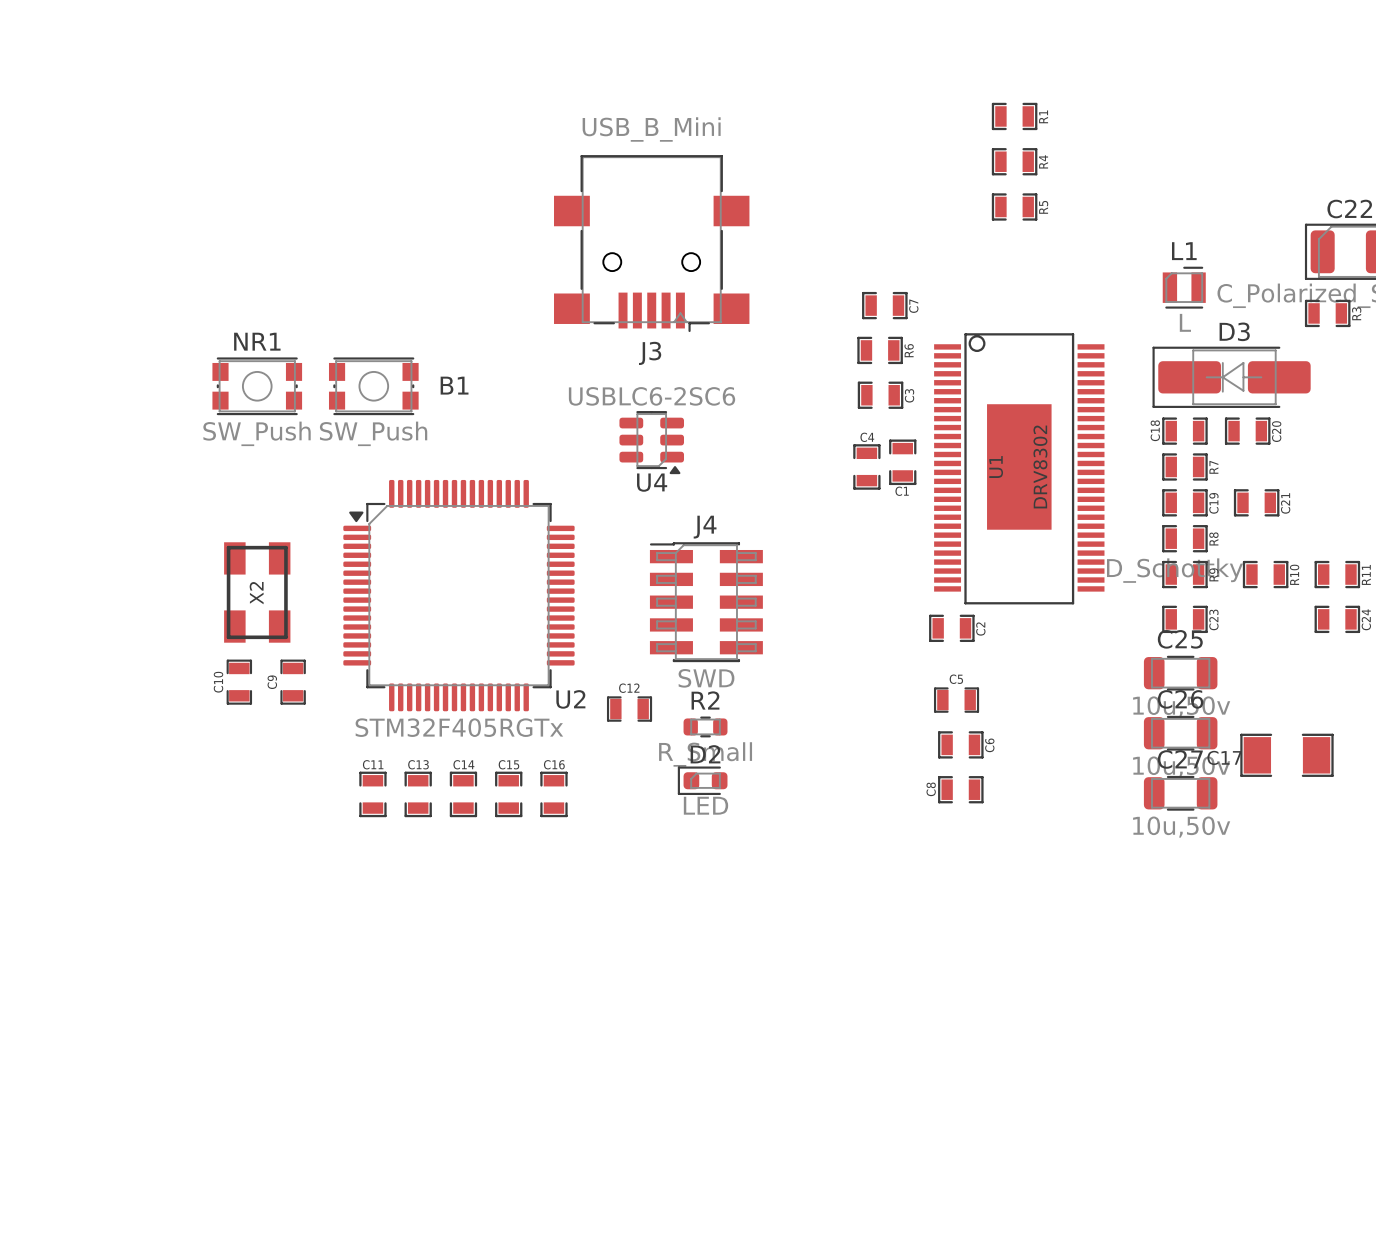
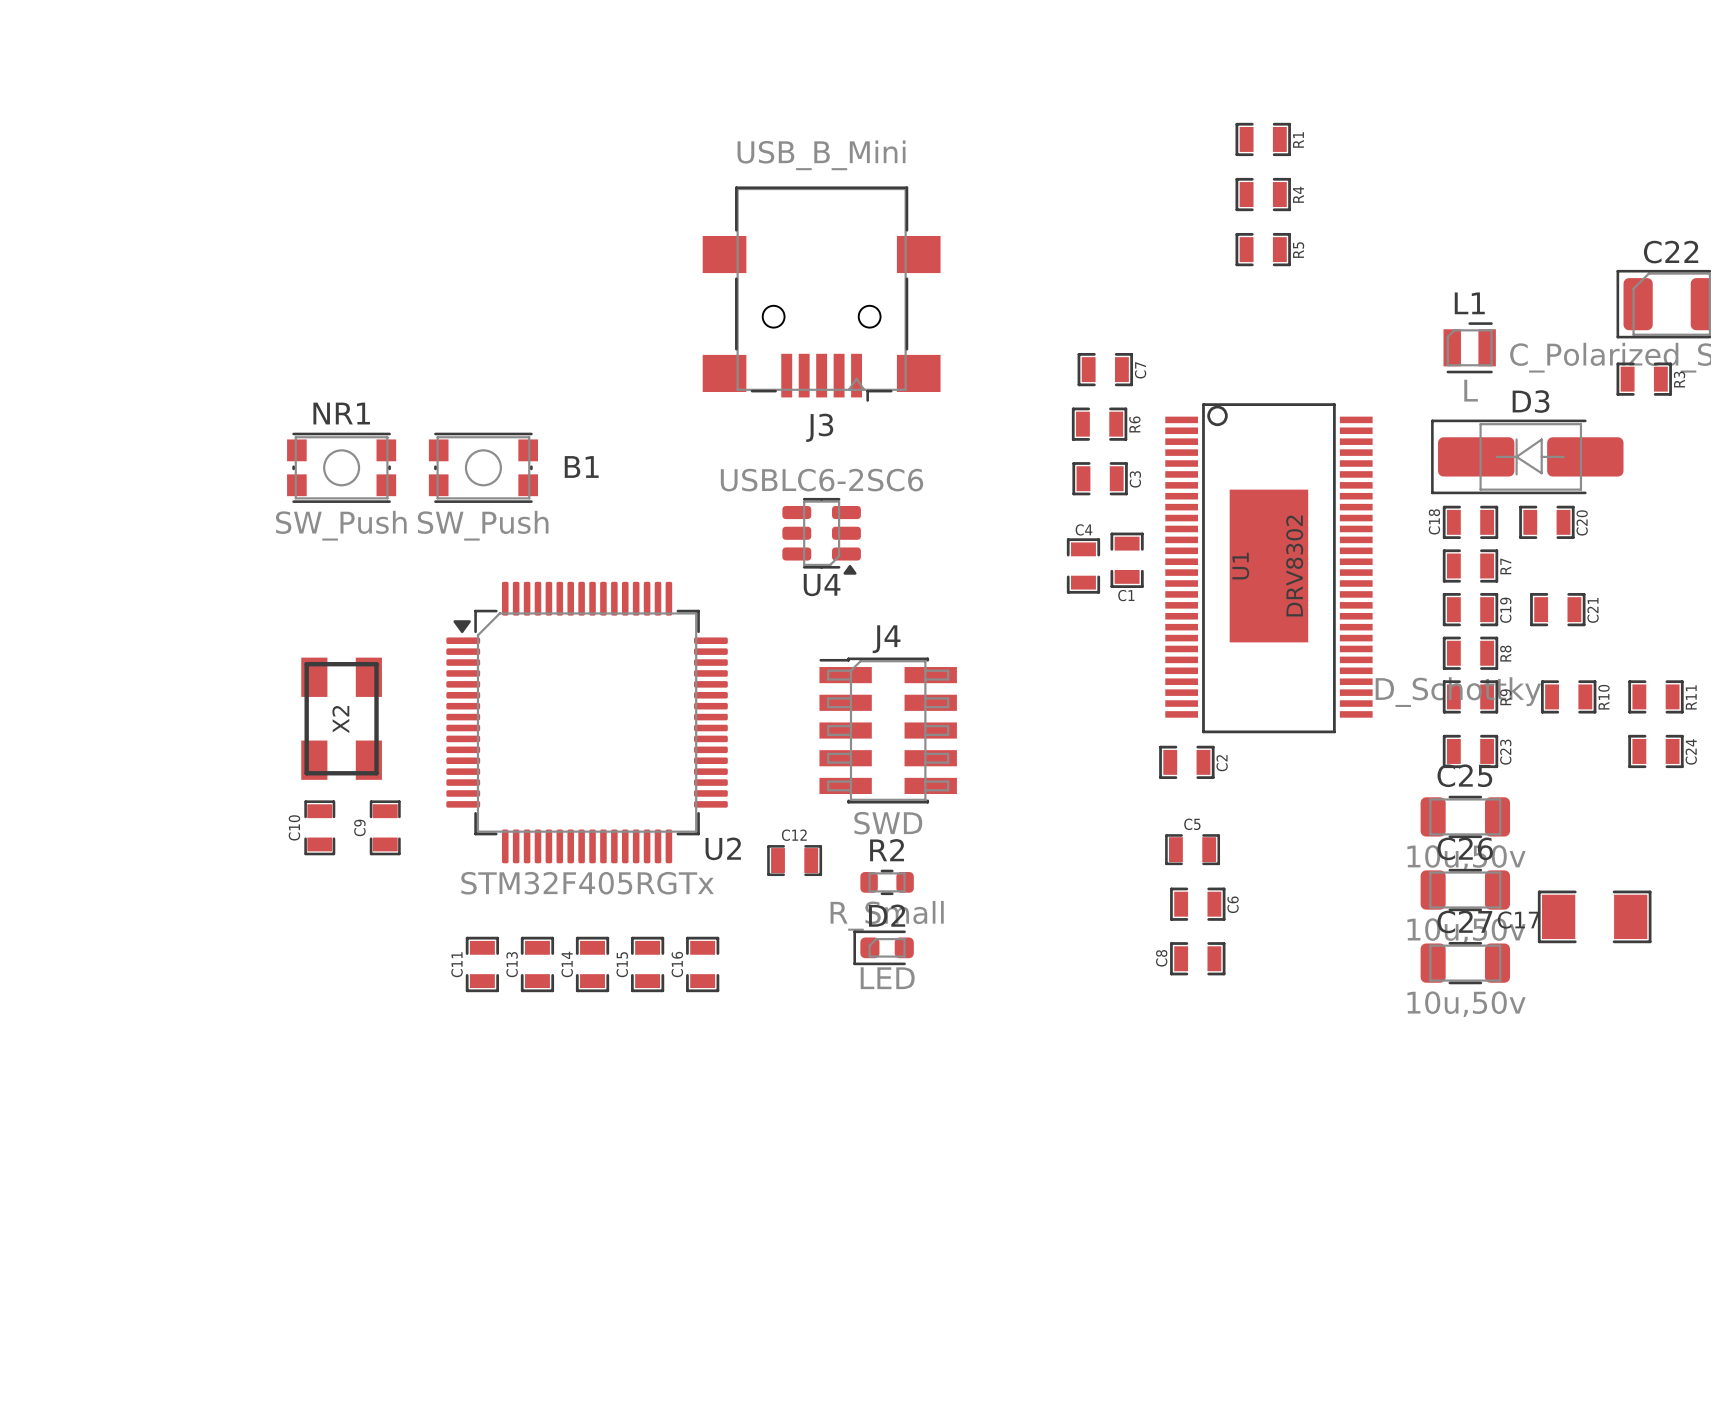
C11 name rotation: 0° (373, 764) -> 90° counterclockwise (457, 964)
C11 name position: C11 (373, 764) -> C11 (457, 964)
C13 name rotation: 0° (418, 764) -> 90° counterclockwise (512, 964)
C13 name position: C13 (418, 764) -> C13 (512, 964)
C14 name rotation: 0° (463, 764) -> 90° counterclockwise (567, 964)
C14 name position: C14 (463, 764) -> C14 (567, 964)
C15 name rotation: 0° (508, 764) -> 90° counterclockwise (622, 964)
C15 name position: C15 (508, 764) -> C15 (622, 964)
C16 name rotation: 0° (554, 764) -> 90° counterclockwise (677, 964)
C16 name position: C16 (554, 764) -> C16 (677, 964)

